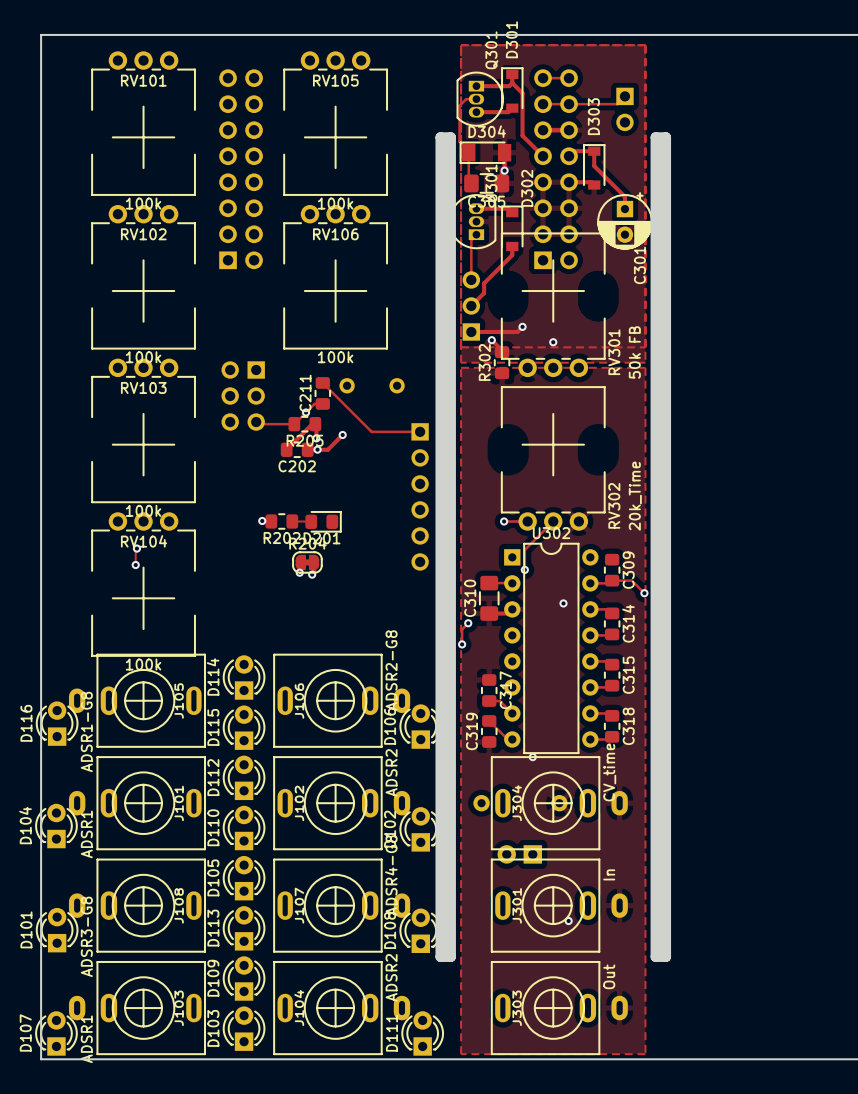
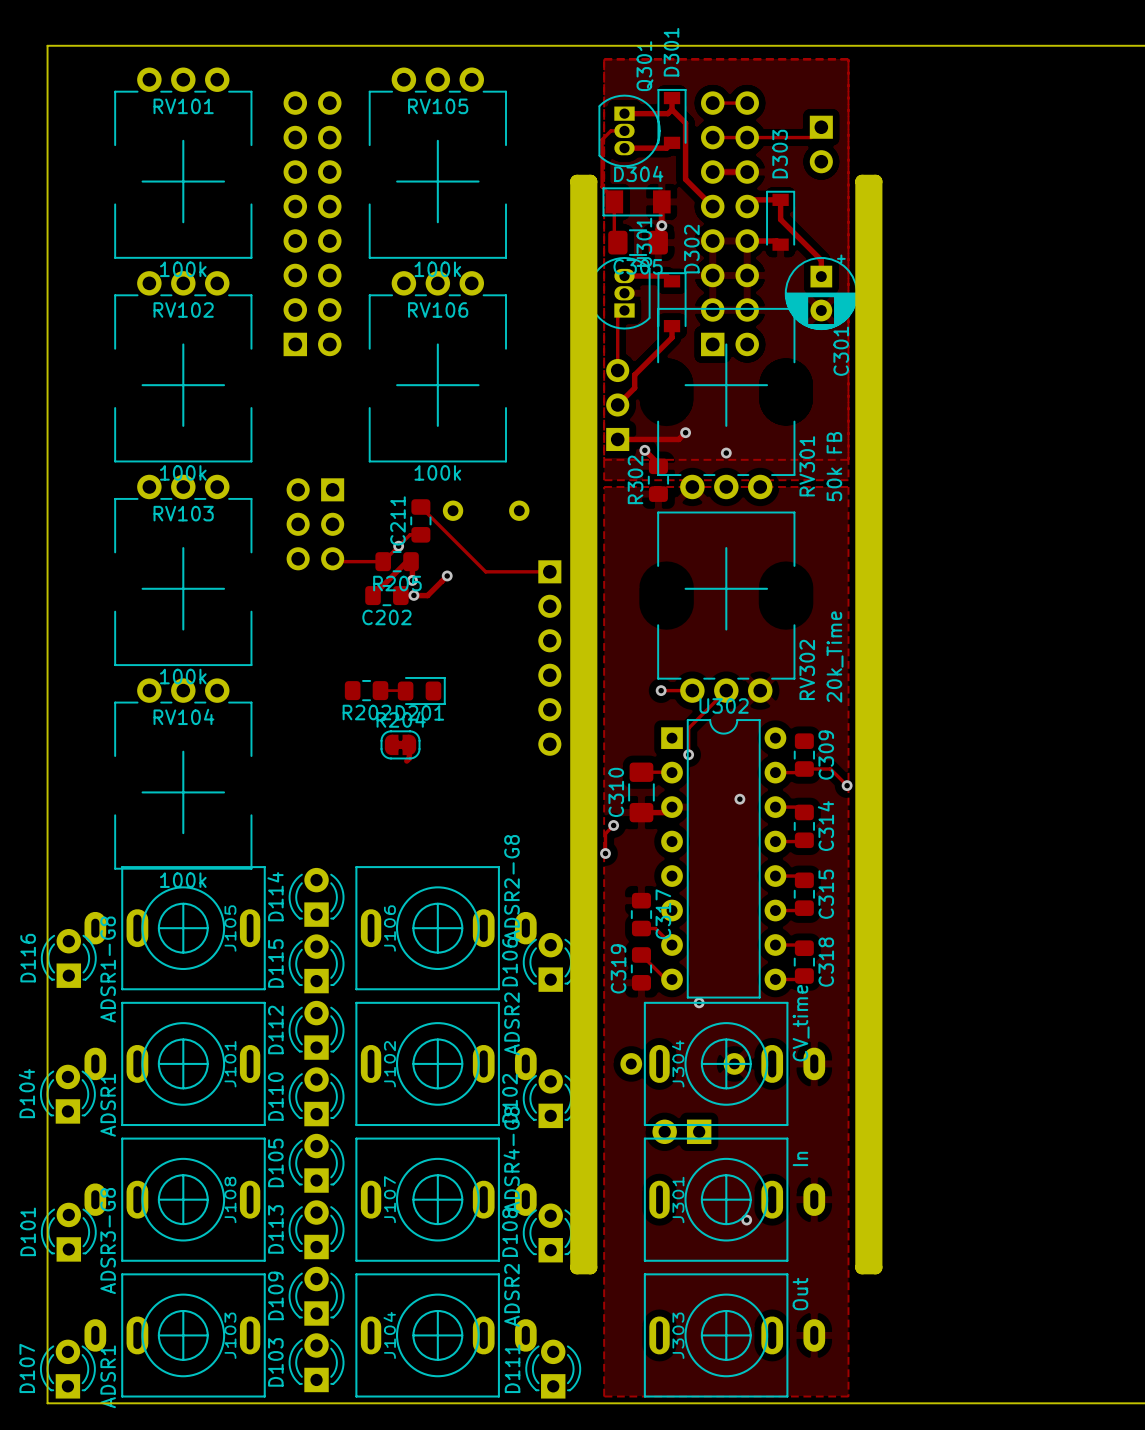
via: (262, 520) -> none
track: (136, 548) (135, 565) -> none
via: (136, 548) -> none
via: (135, 565) -> none
via: (299, 572) -> none
via: (312, 574) -> none

